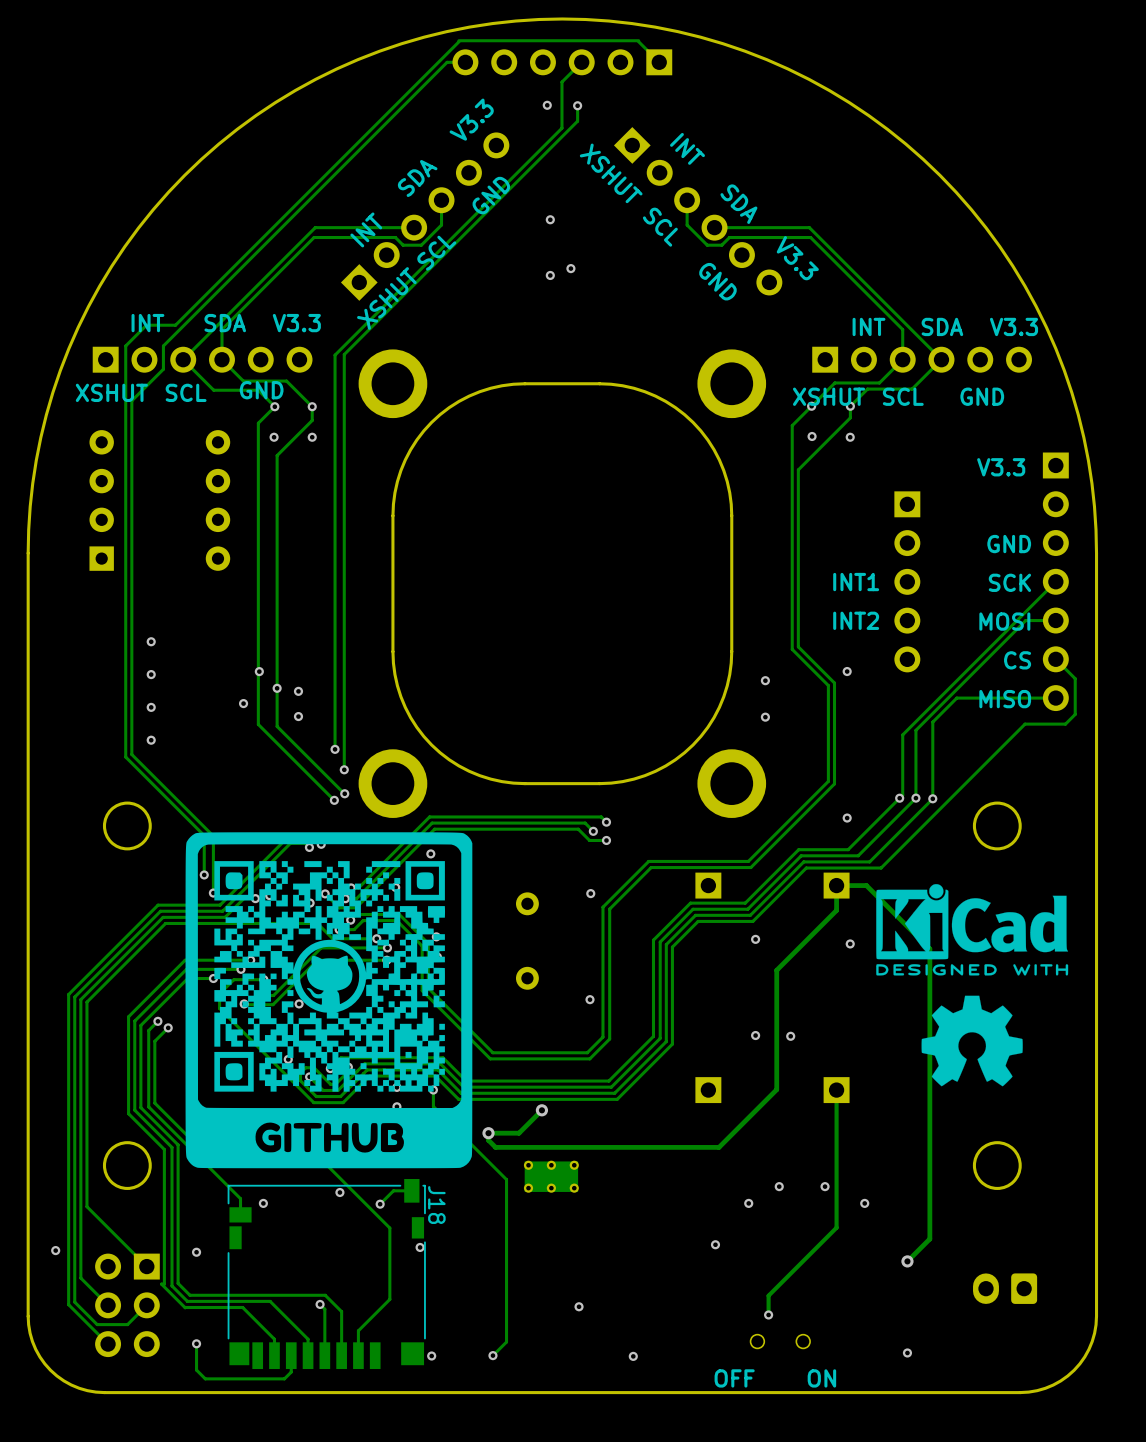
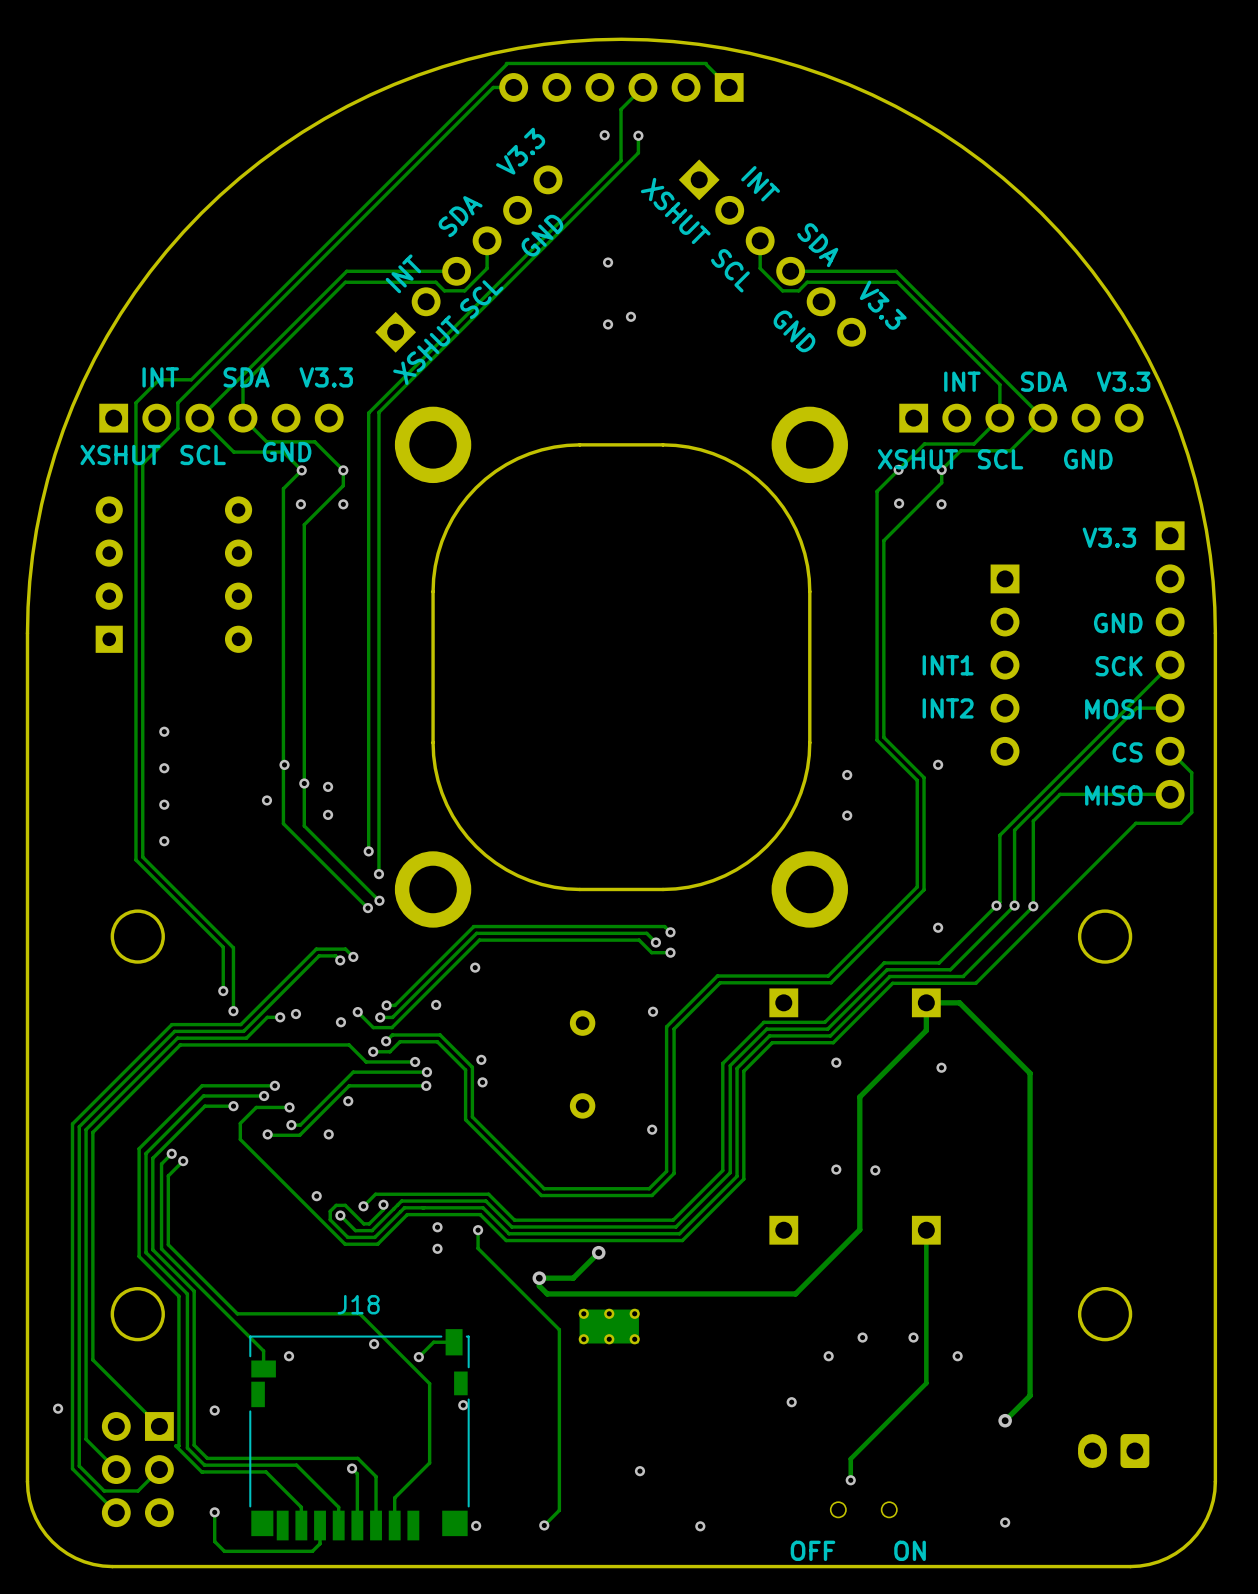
drawing: [185, 832, 473, 1169] -> none
drawing: [876, 884, 1069, 976] -> none
drawing: [921, 995, 1023, 1087] -> none
J18 name rotation: 0° (436, 1205) -> 90° counterclockwise (358, 1304)
J18 name position: J18 (436, 1205) -> J18 (358, 1304)

